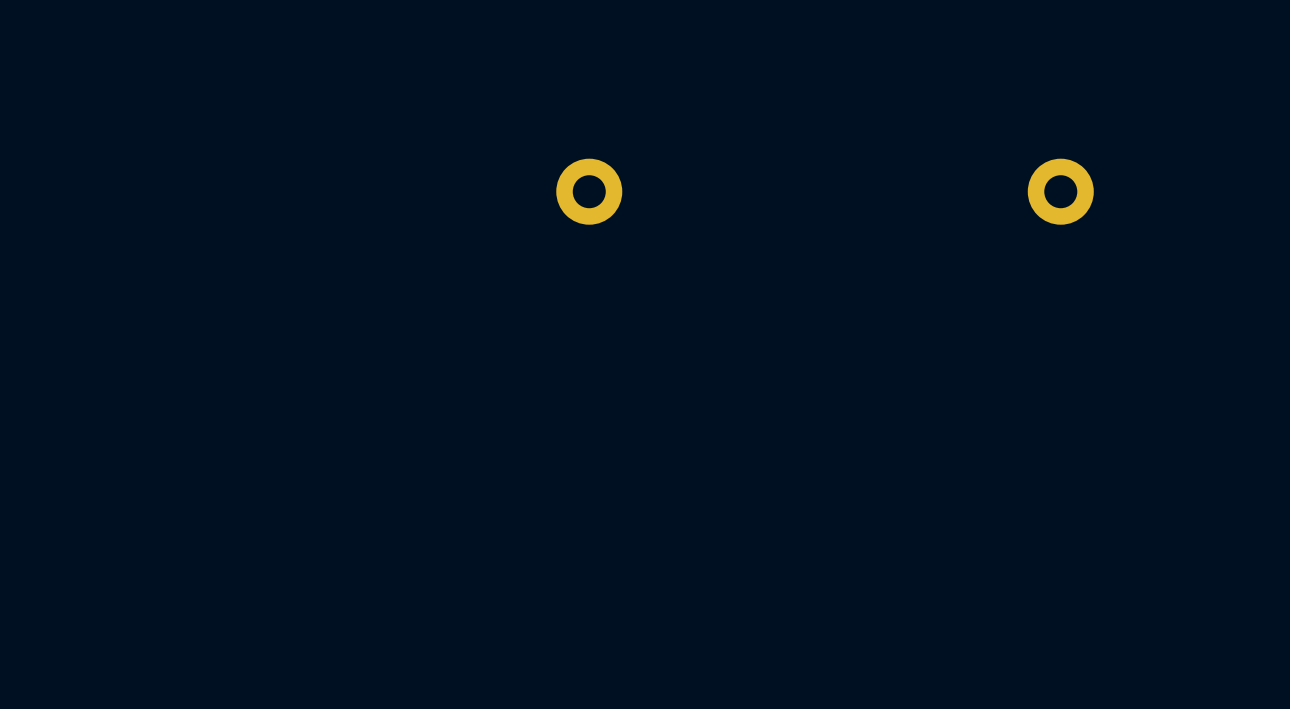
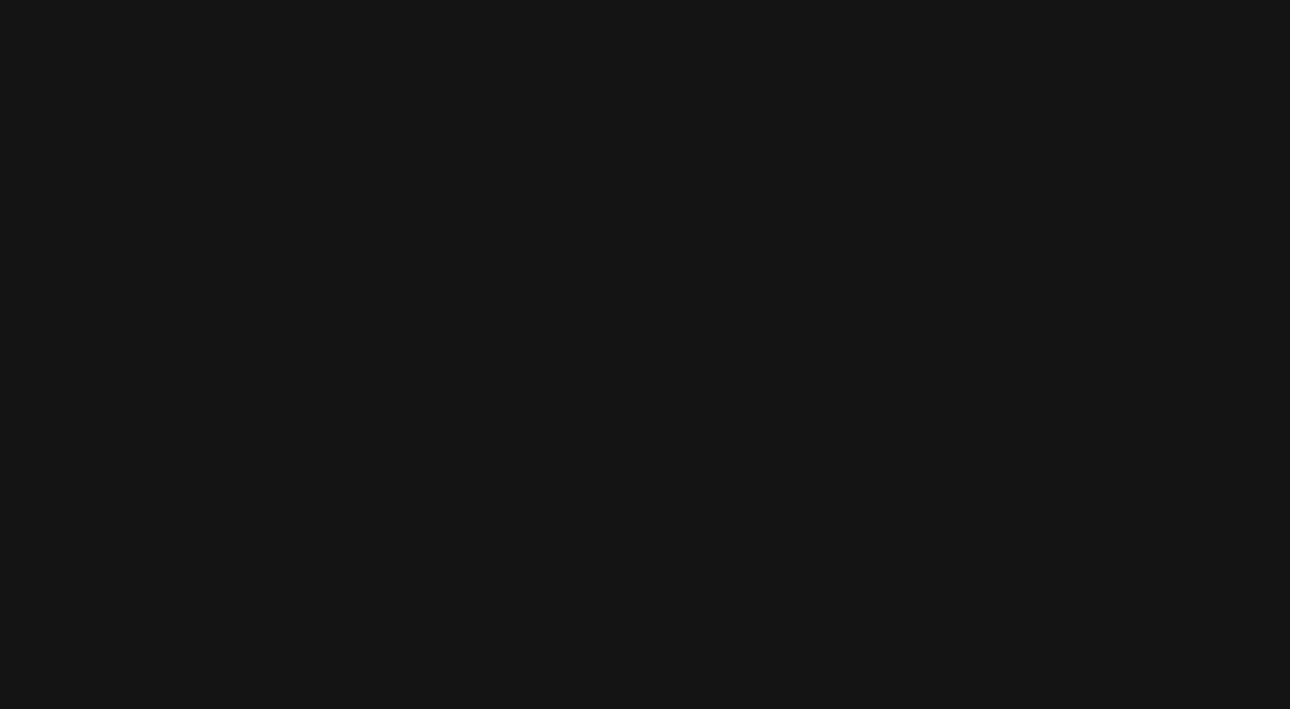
part: (589, 191) -> none
part: (1060, 191) -> none

